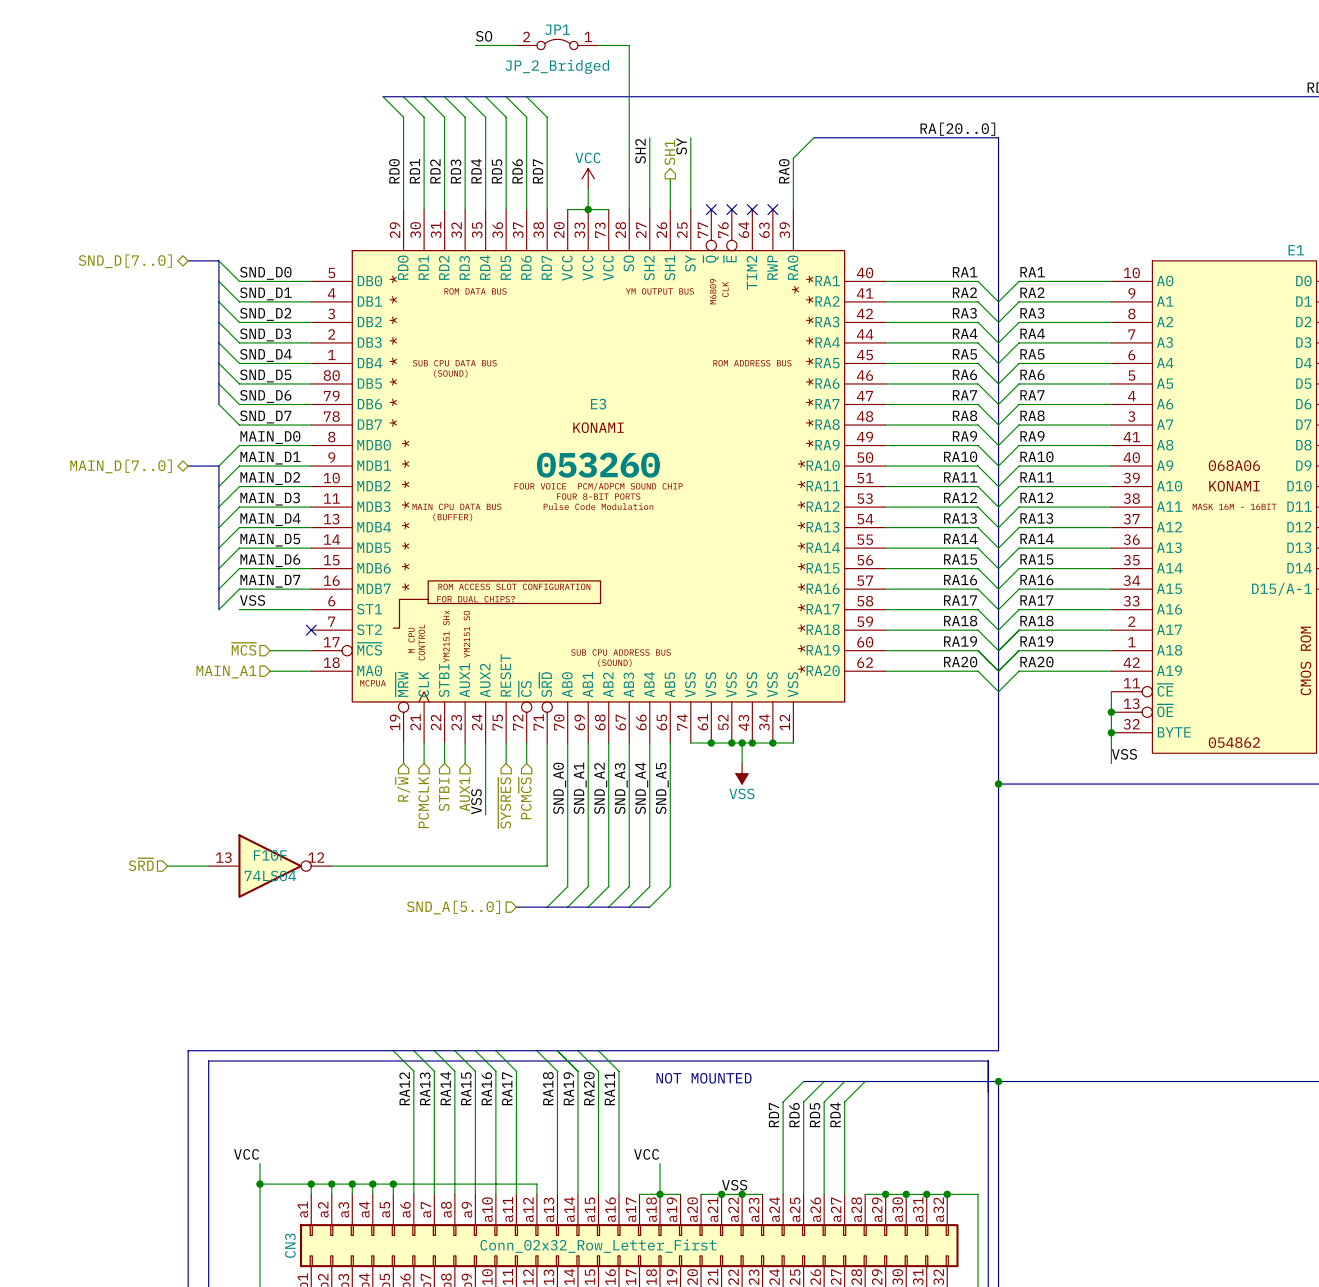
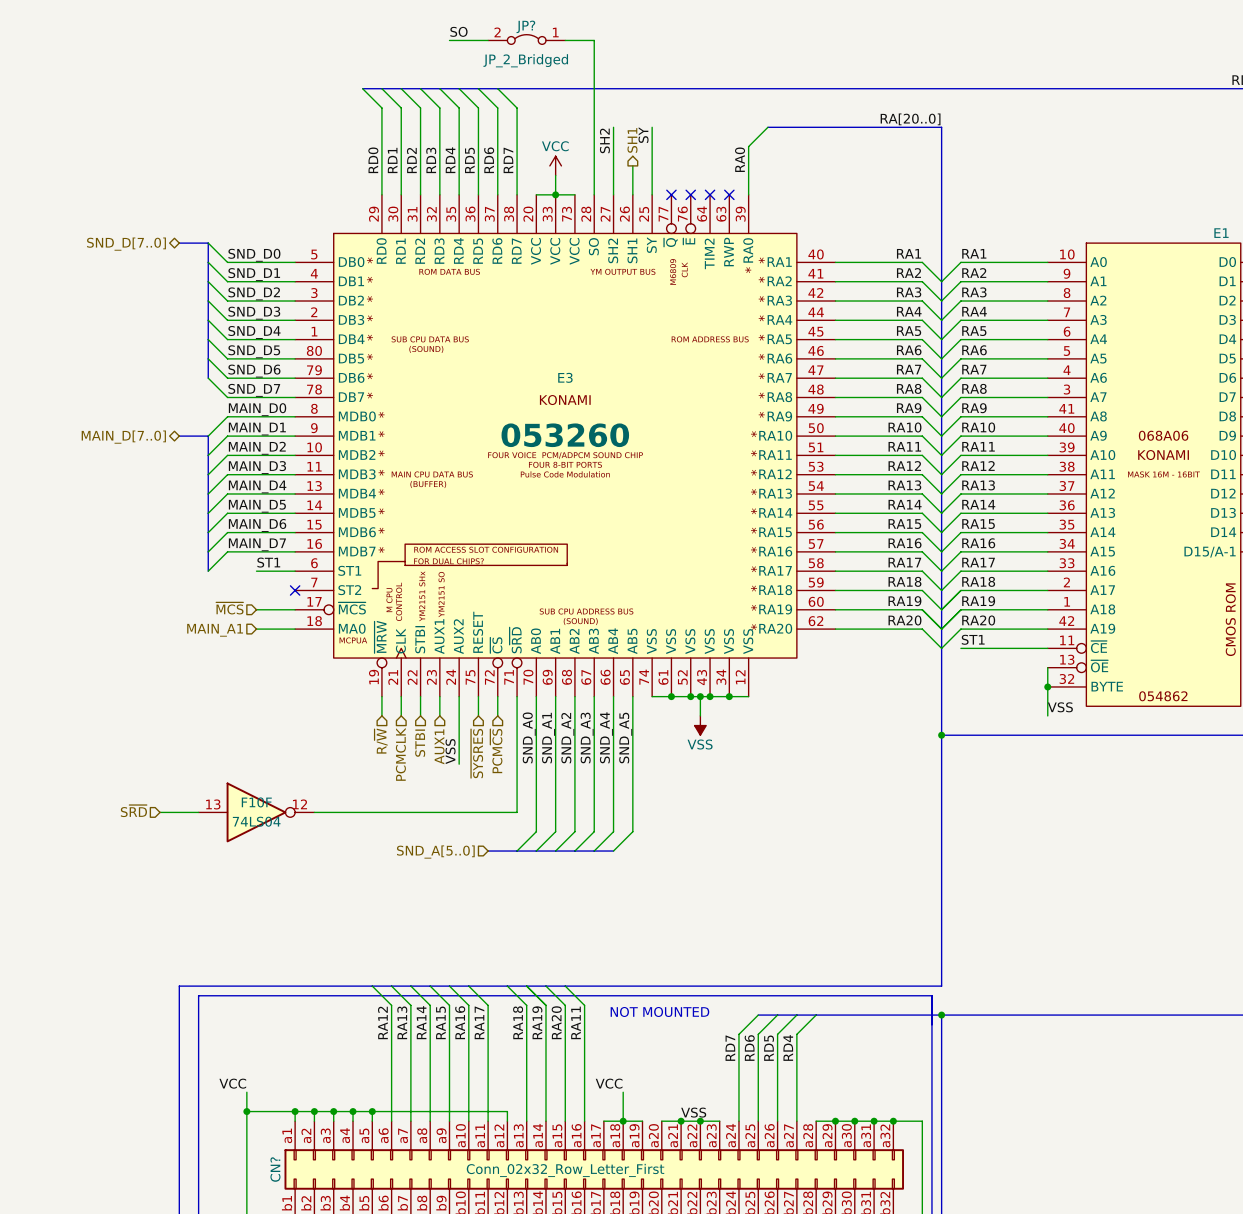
JP1 name: JP1 (557, 29) -> JP? (525, 26)
label: VSS (252, 600) -> none
label: none -> ST1 (268, 562)
wire: (239, 609) (270, 609) -> none
label: none -> ST1 (973, 639)
wire: (1111, 691) (1111, 712) -> (1047, 648) (960, 648)
junction: (1111, 712) -> none
CN3 name: CN3 (290, 1245) -> CN? (275, 1169)

